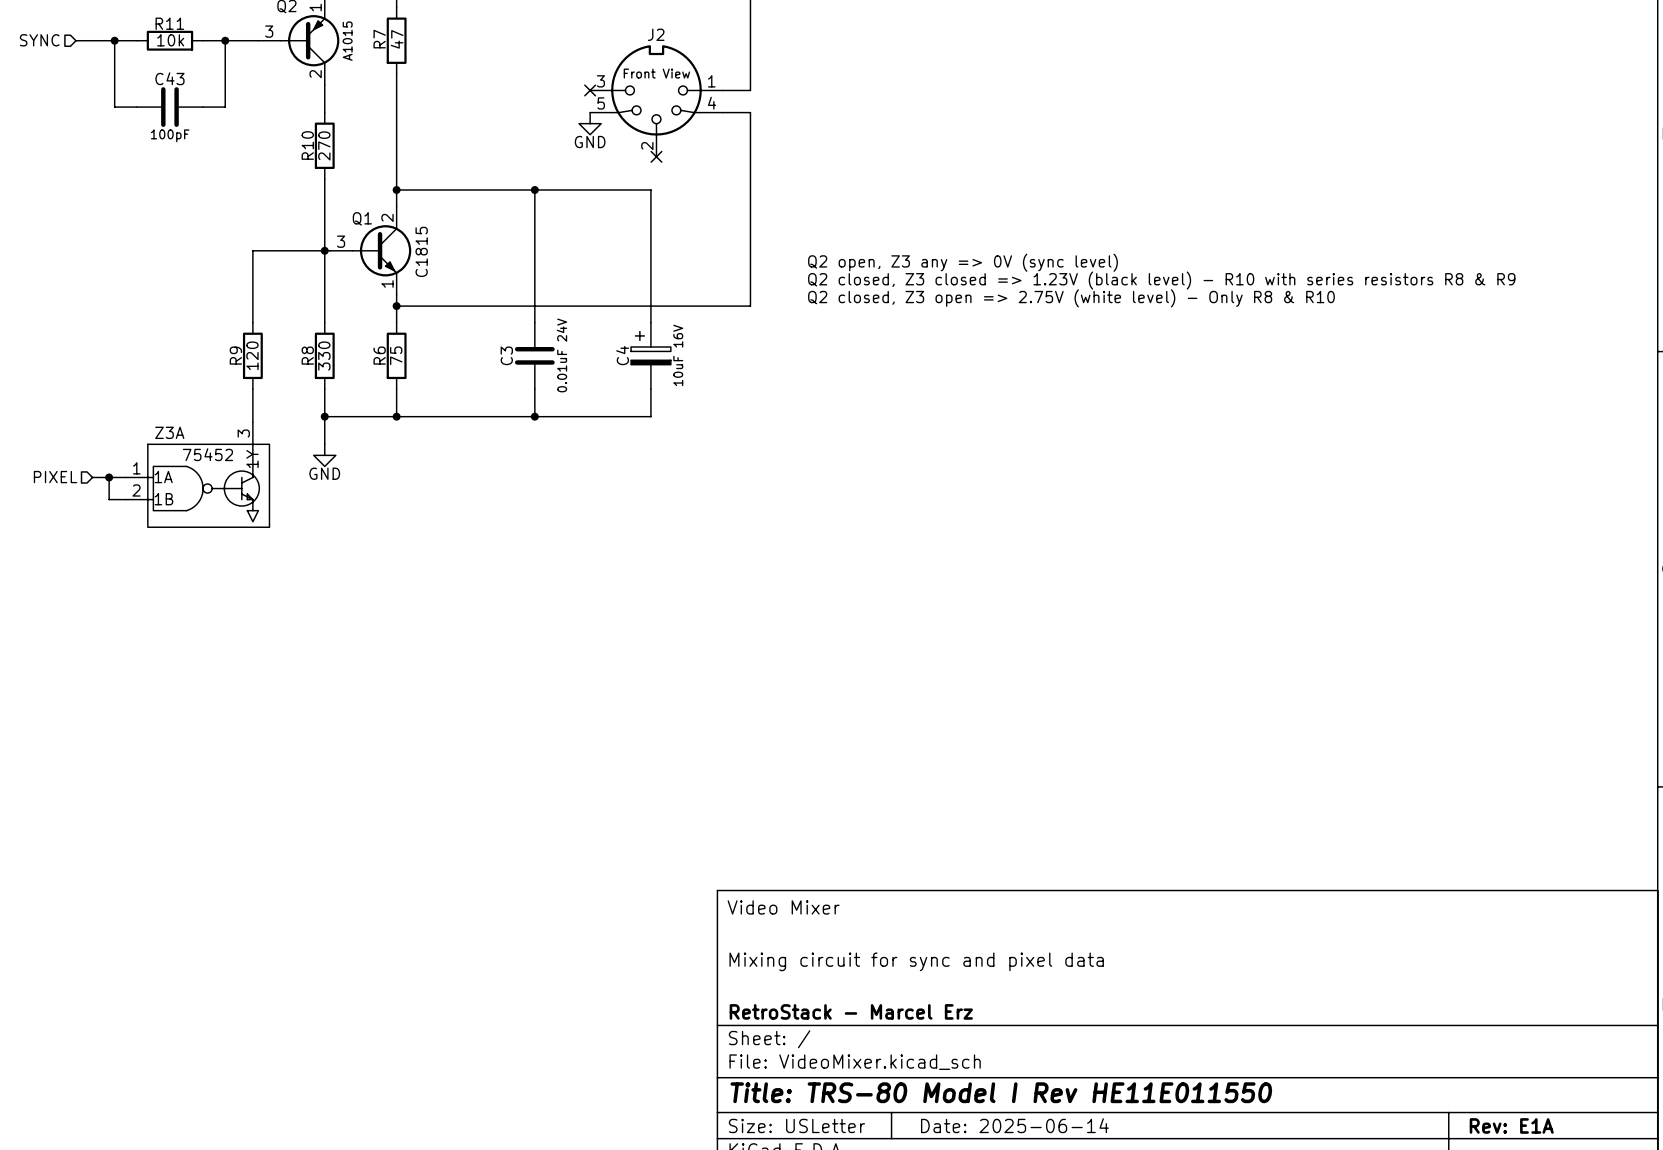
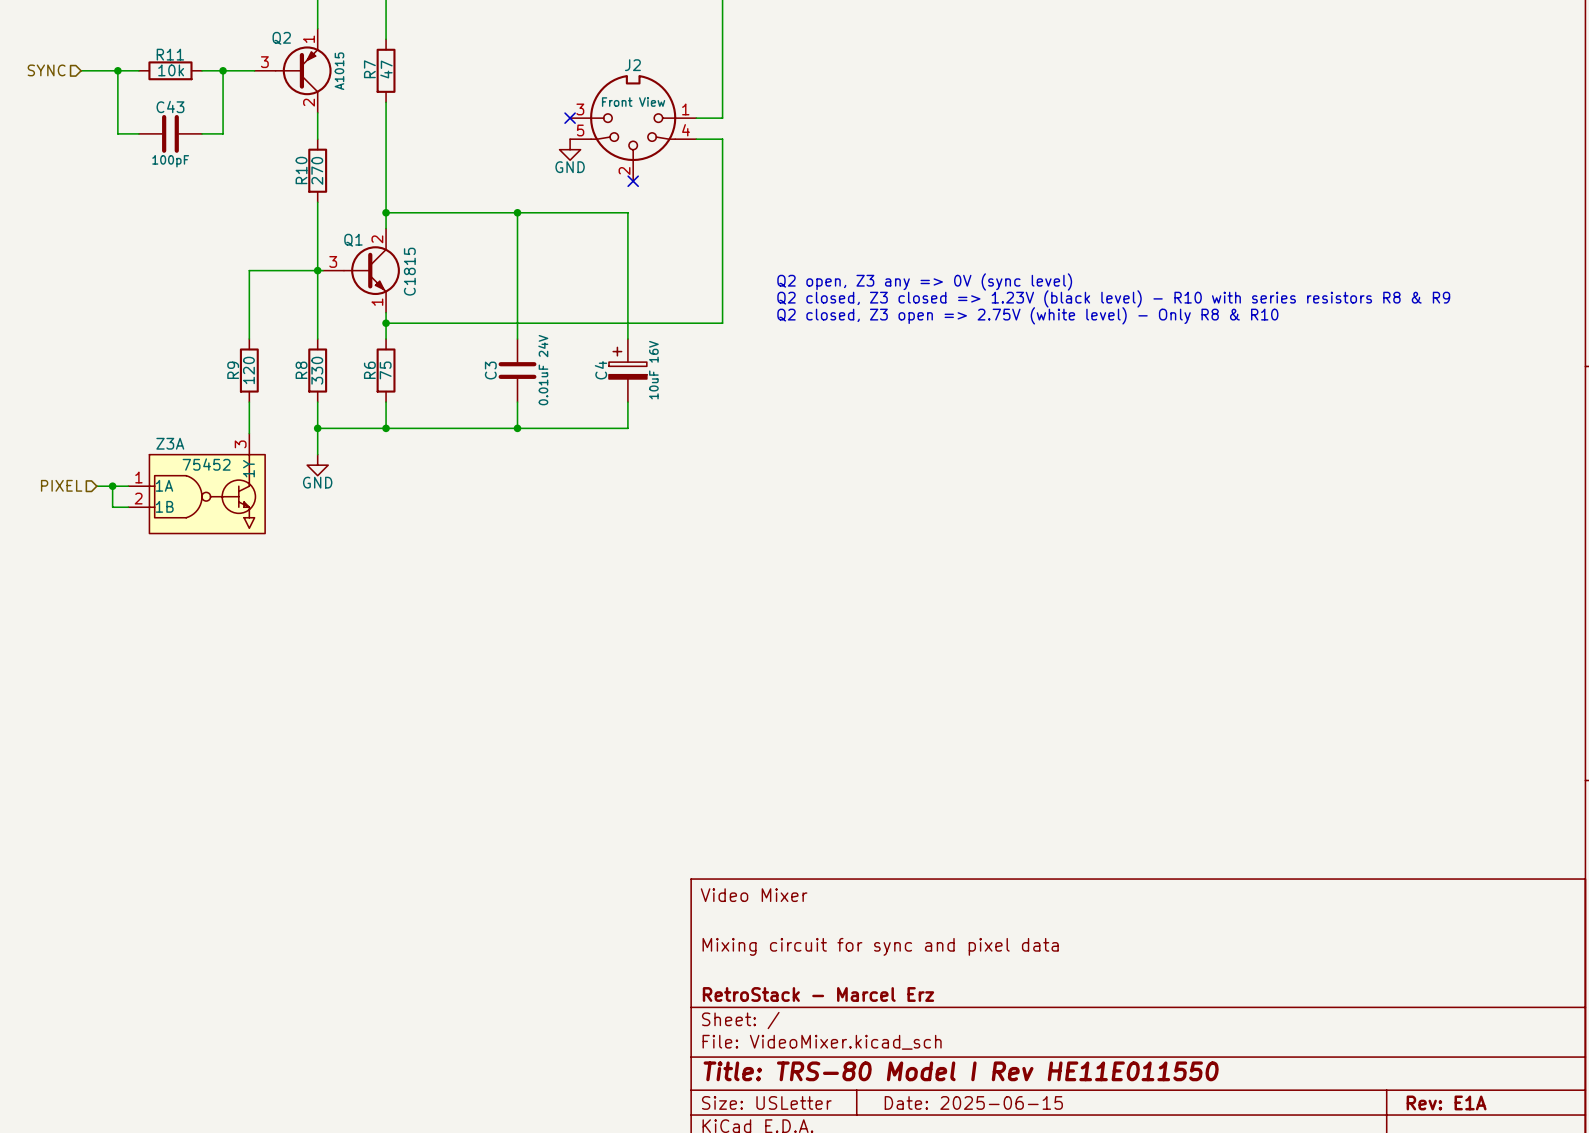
title block: Date: 2025-06-14 (1014, 1125) -> Date: 2025-06-15 (973, 1102)

